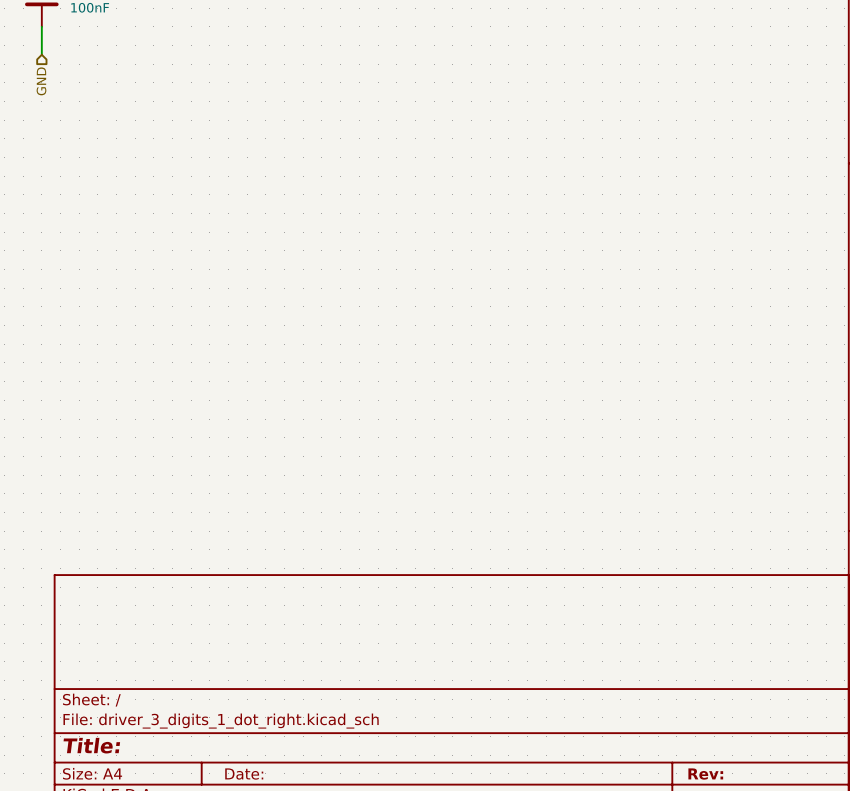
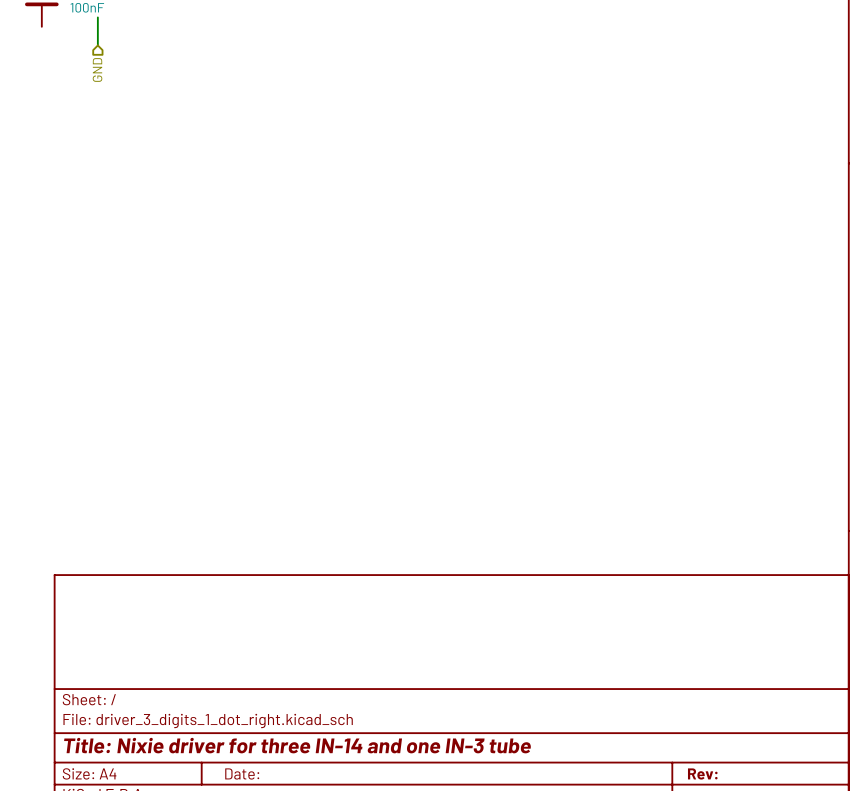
wire: (41, 26) (41, 54) -> (97, 17) (97, 45)
hierarchical label position: GND (41, 81) -> GND (97, 69)
title block: Title: (91, 745) -> Title: Nixie driver for three IN-14 and one IN-3 tube (297, 745)

